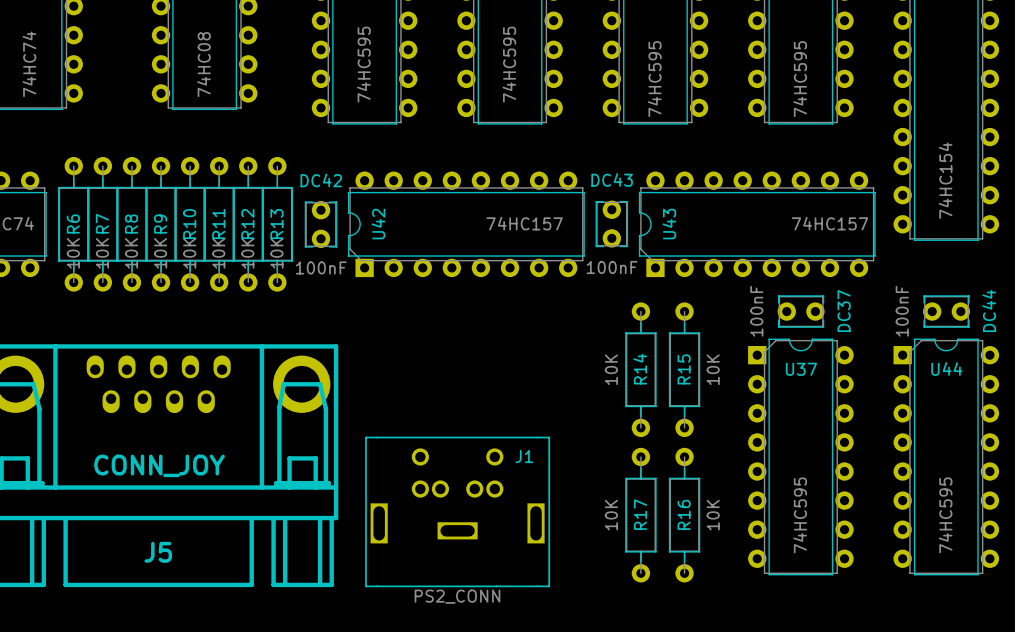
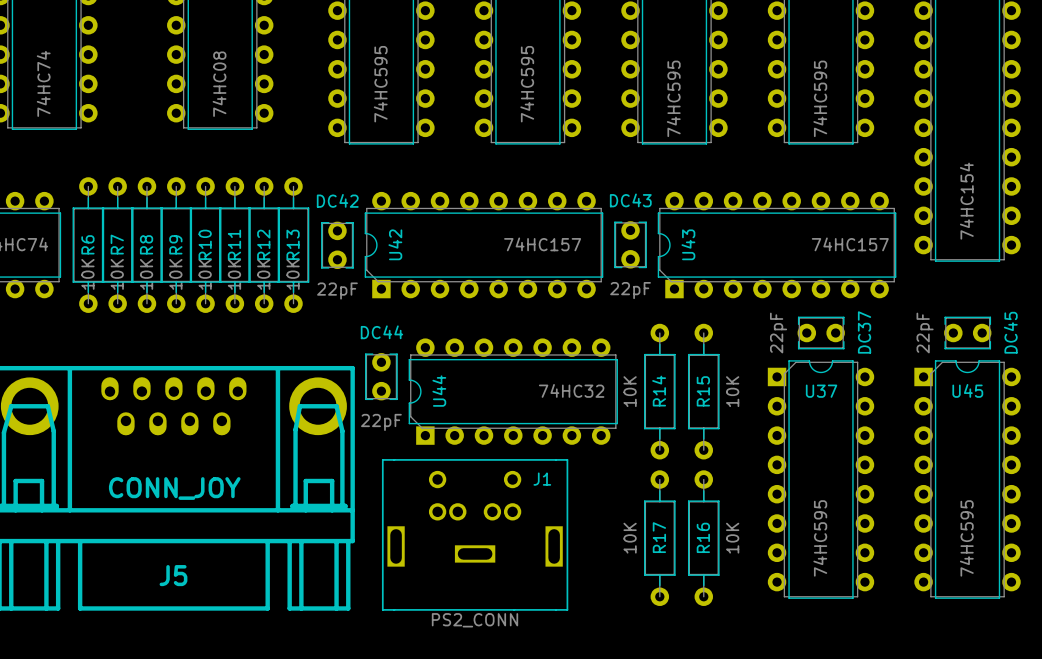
DC42 value: 100nF (321, 267) -> 22pF (337, 291)
DC43 value: 100nF (612, 267) -> 22pF (630, 290)
DC37 value: 100nF (756, 311) -> 22pF (778, 333)
DC44 value: 100nF (902, 311) -> 22pF (925, 333)
DC44 name: DC44 (989, 311) -> DC45 (1010, 332)
DC44: none -> 22pF (381, 376)
U44: none -> 74HC32 (513, 391)
U44 name: U44 (946, 369) -> U45 (967, 390)

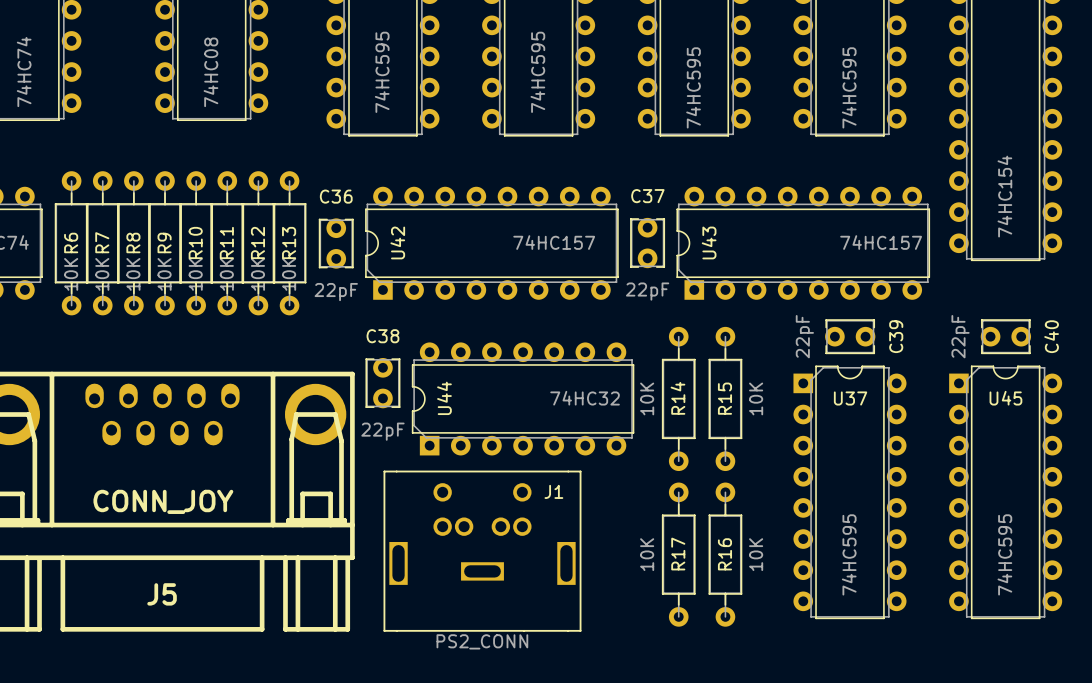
DC42 name: DC42 (337, 200) -> C36 (336, 196)
DC43 name: DC43 (630, 200) -> C37 (647, 196)
DC44 name: DC44 (381, 332) -> C38 (382, 336)
DC37 name: DC37 (864, 332) -> C39 (896, 336)
DC45 name: DC45 (1010, 332) -> C40 (1051, 336)

